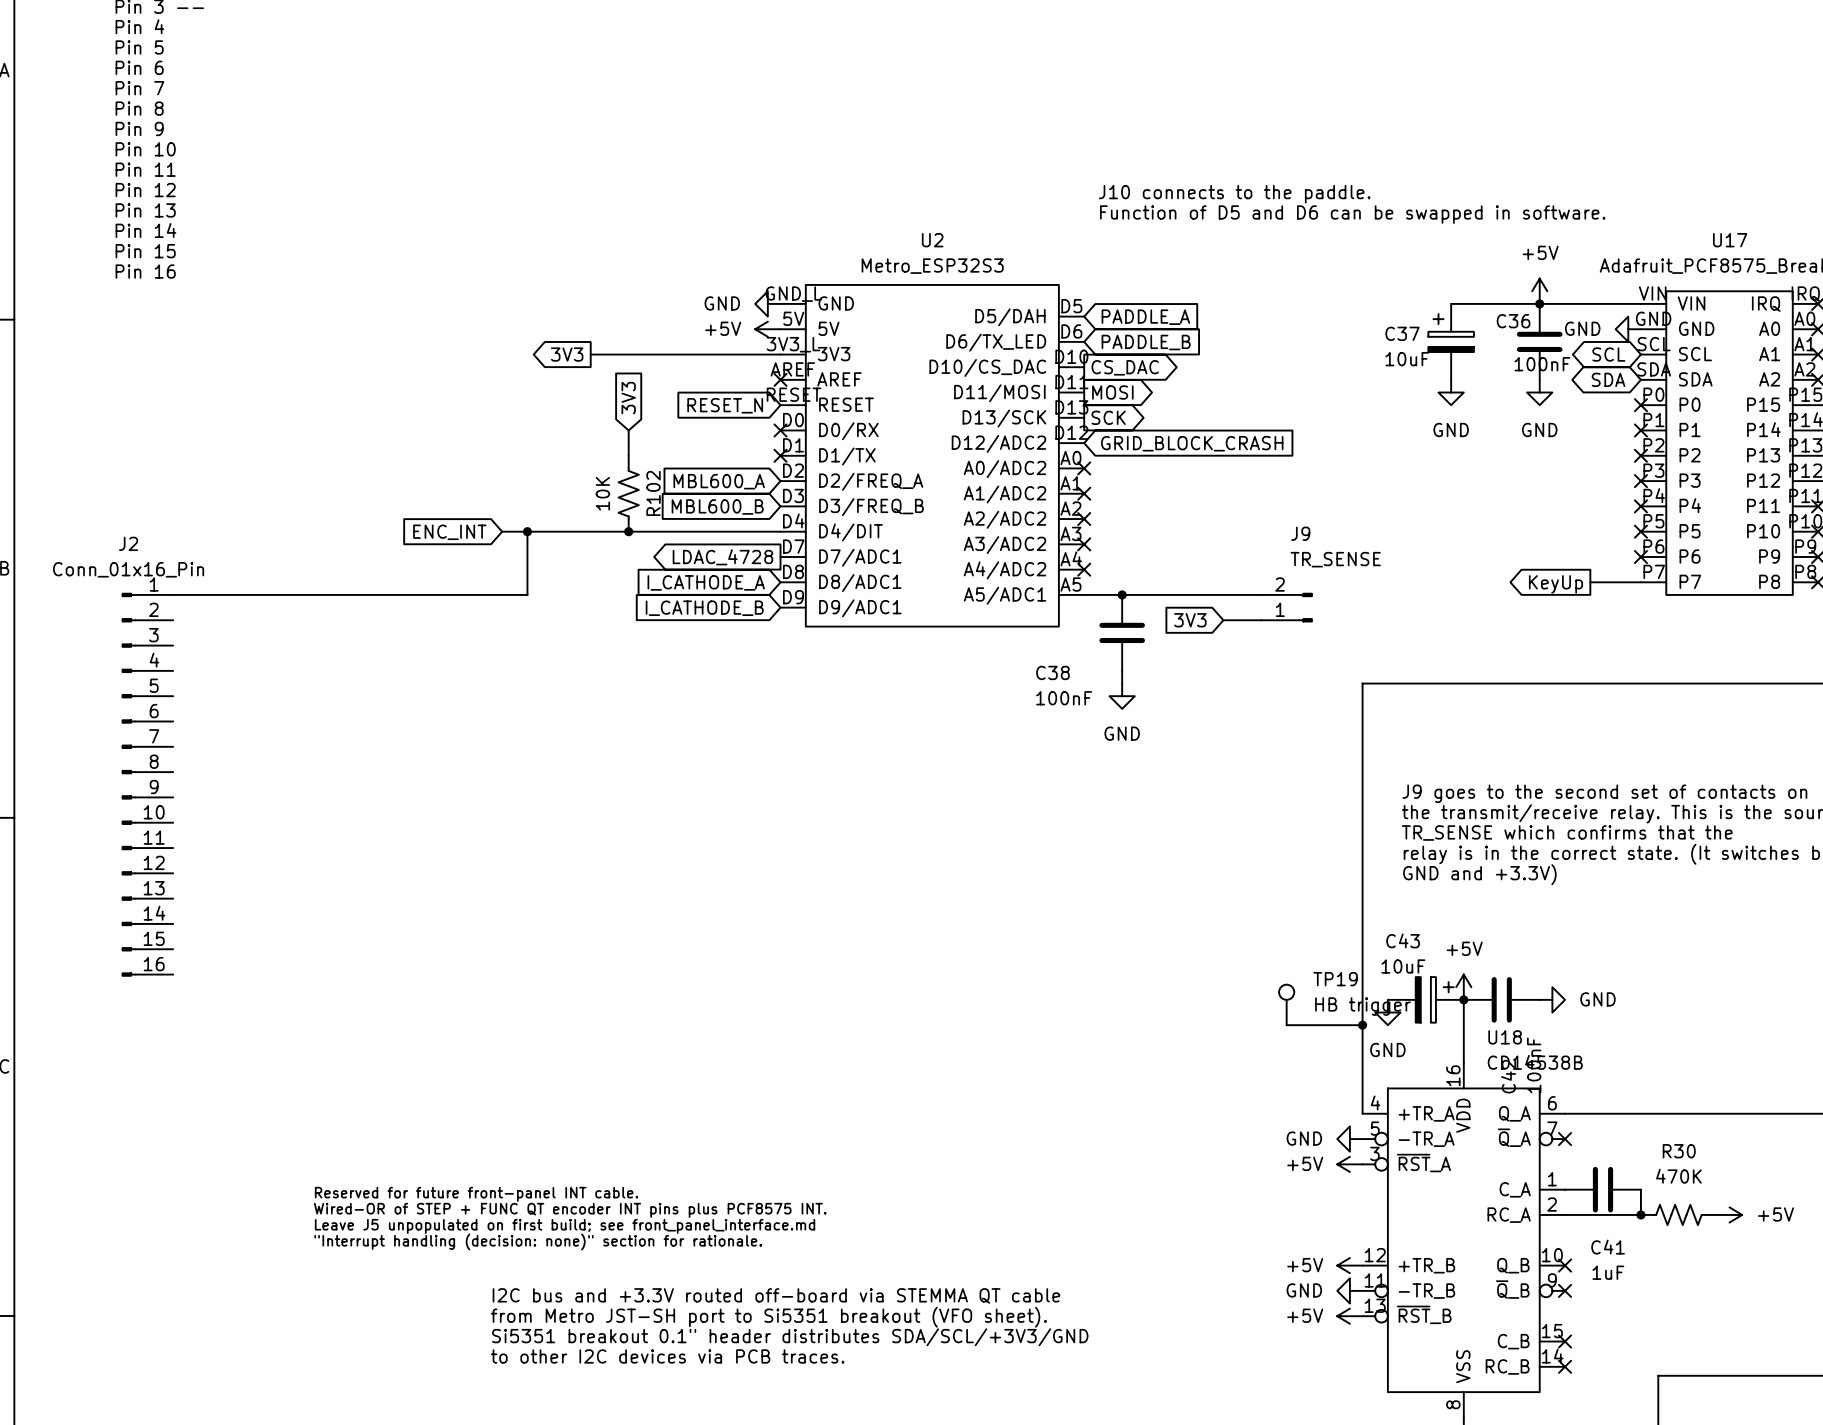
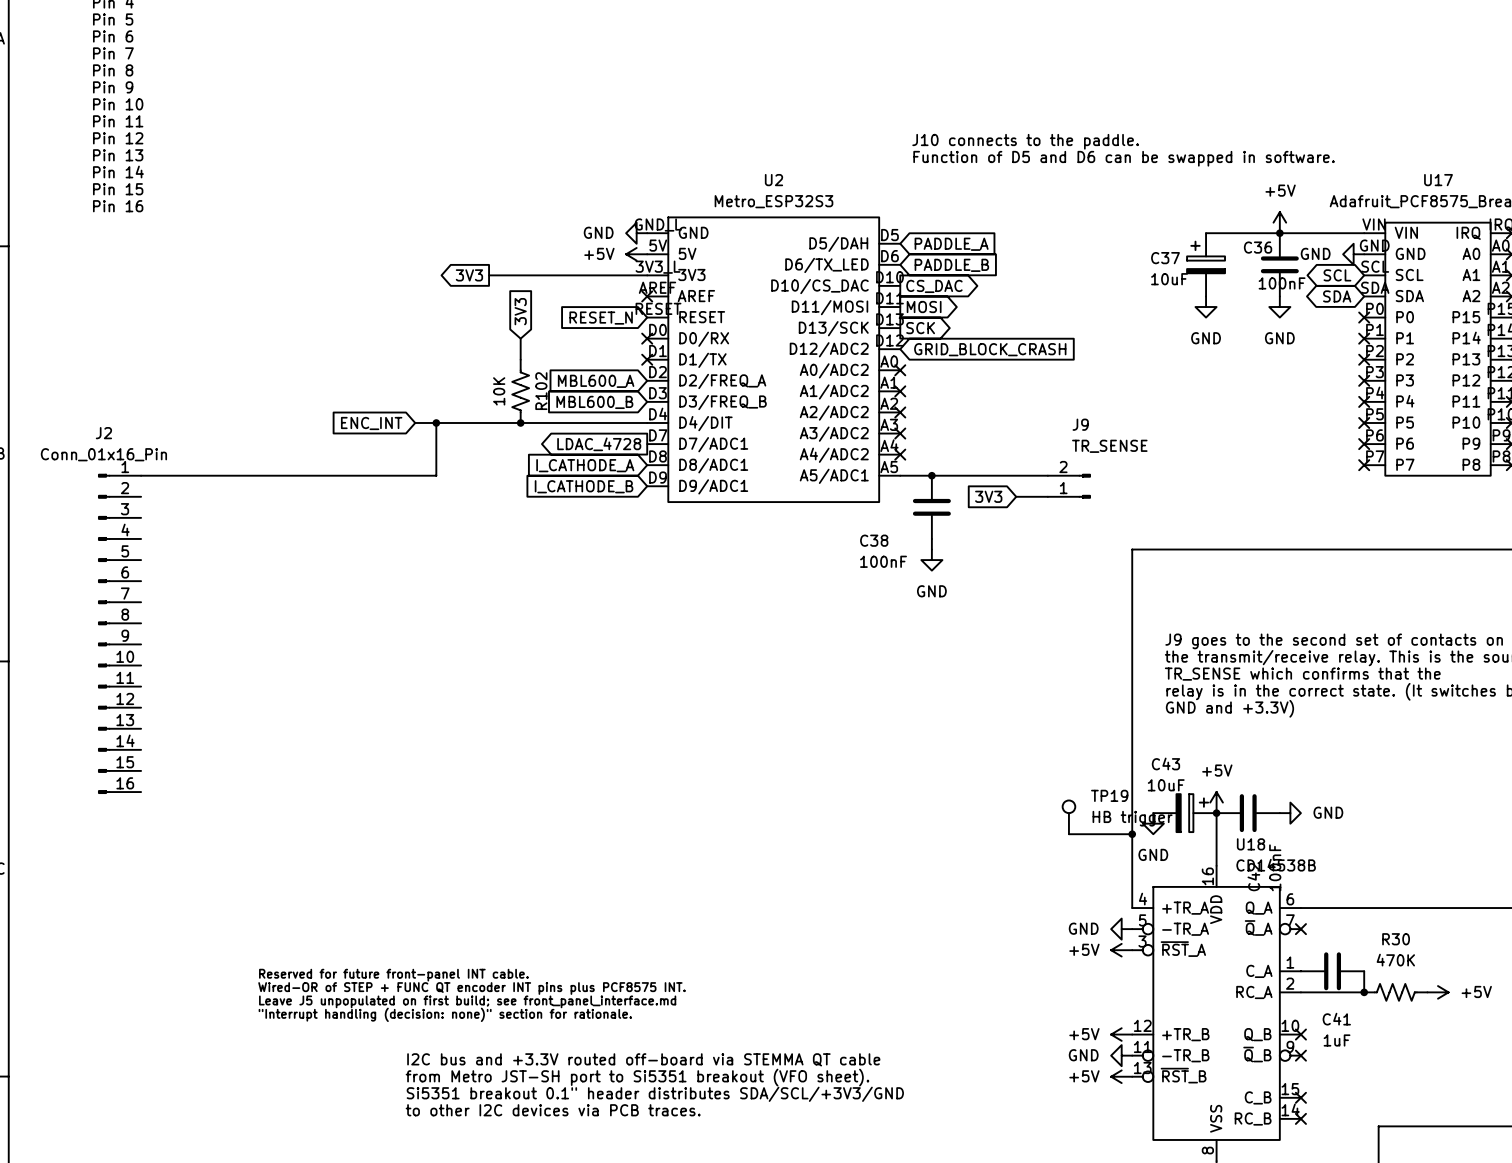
wire: (1590, 582) (1640, 582) -> none
no-connect mark: none -> (1364, 465)
global label: KeyUp (1555, 584) -> none

